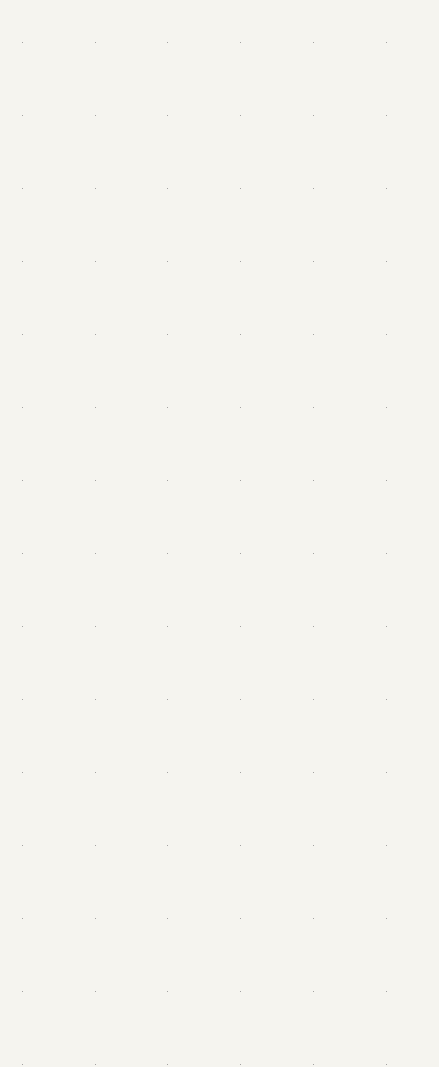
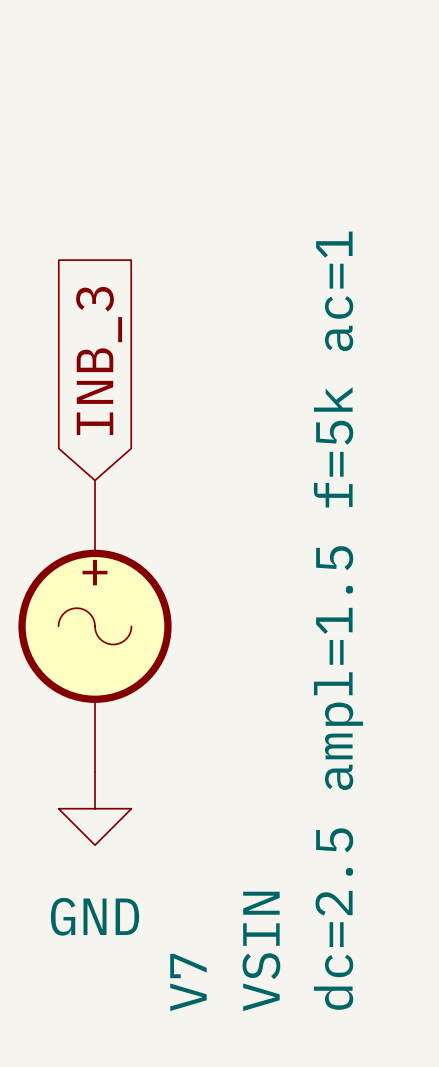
global label: none -> INB_3 (99, 360)
V7: none -> VSIN (95, 626)
power symbol: none -> GND (95, 808)

